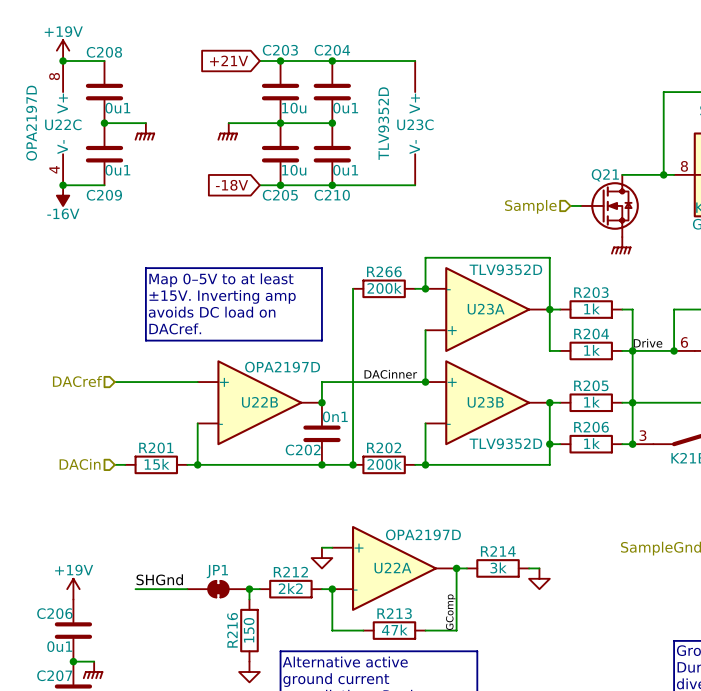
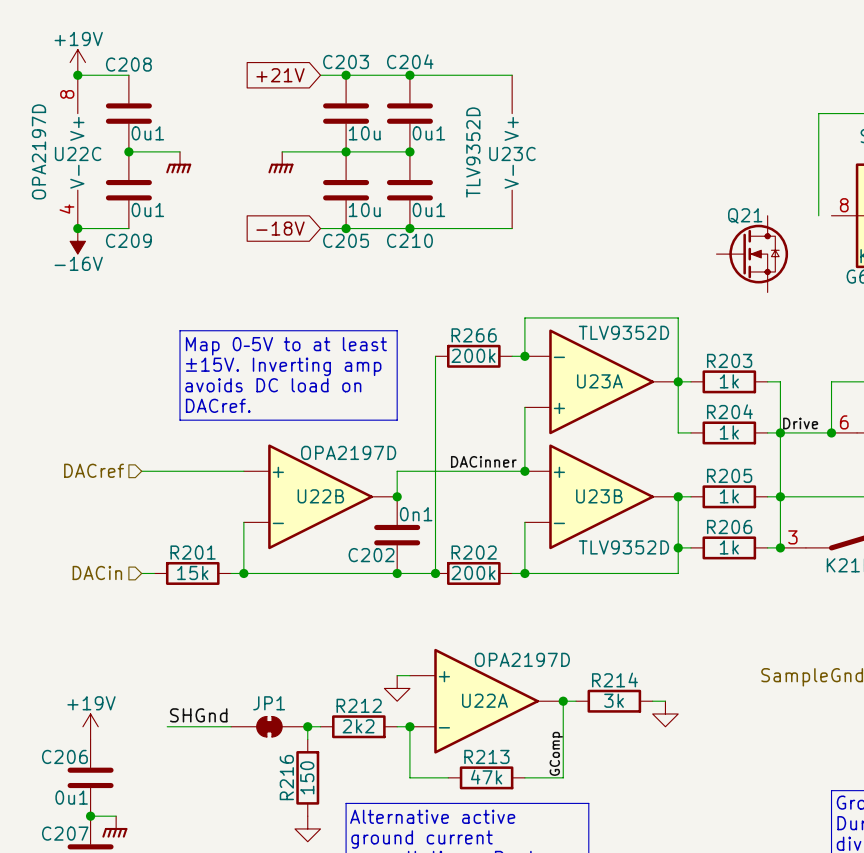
wire: (622, 174) (674, 174) -> none
junction: (663, 174) -> none
wire: (570, 205) (580, 205) -> none
hierarchical label: Sample (530, 206) -> none
power symbol: (621, 245) -> none

